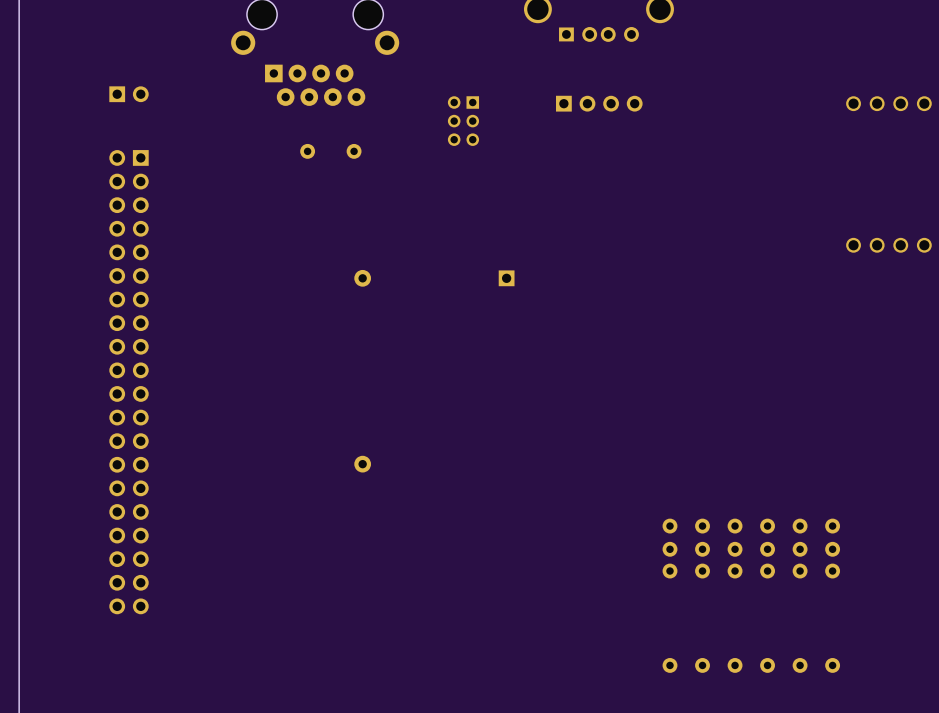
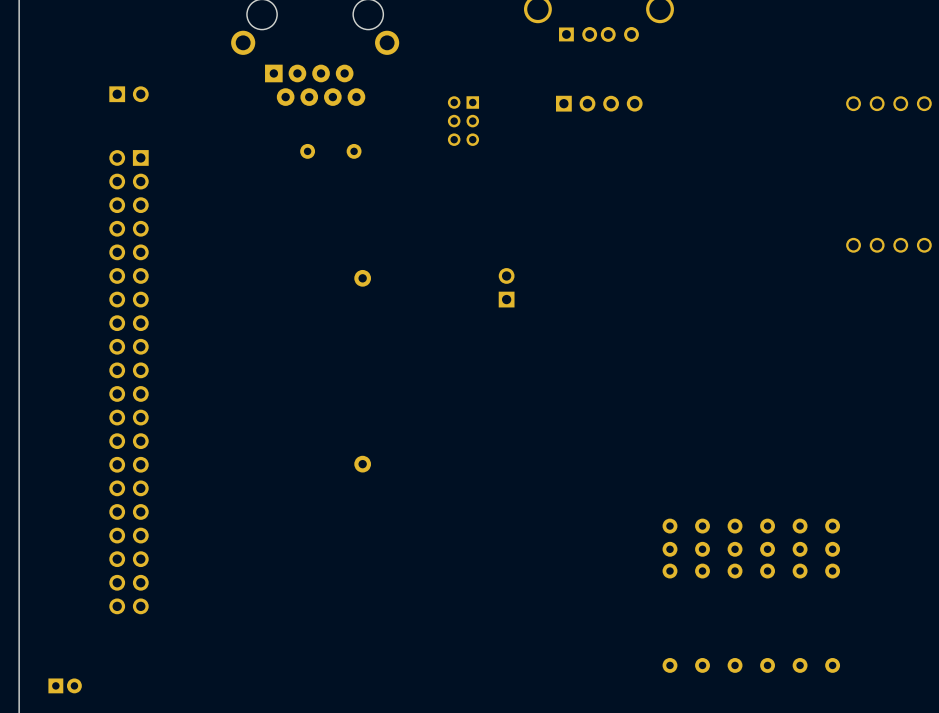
part: (506, 278) -> none
part: none -> (506, 287)
part: none -> (65, 685)

